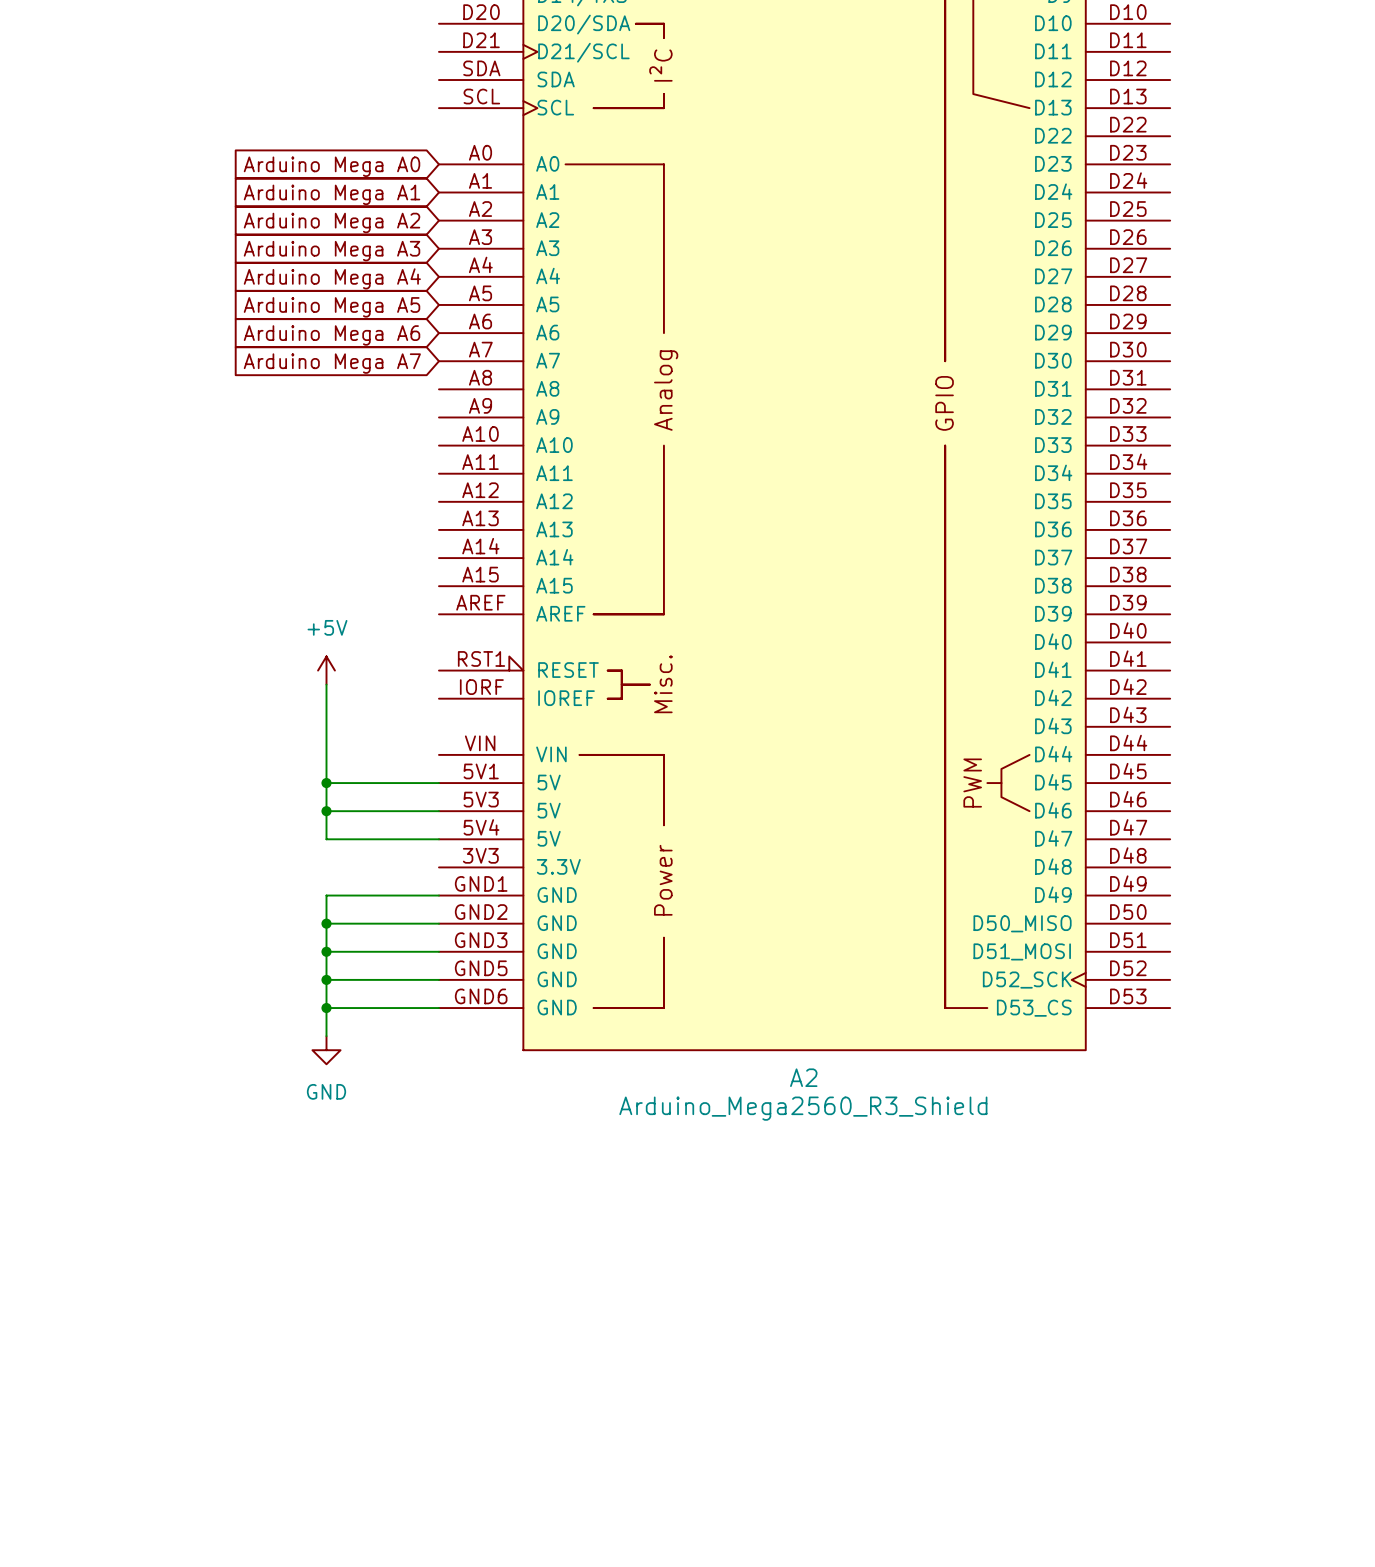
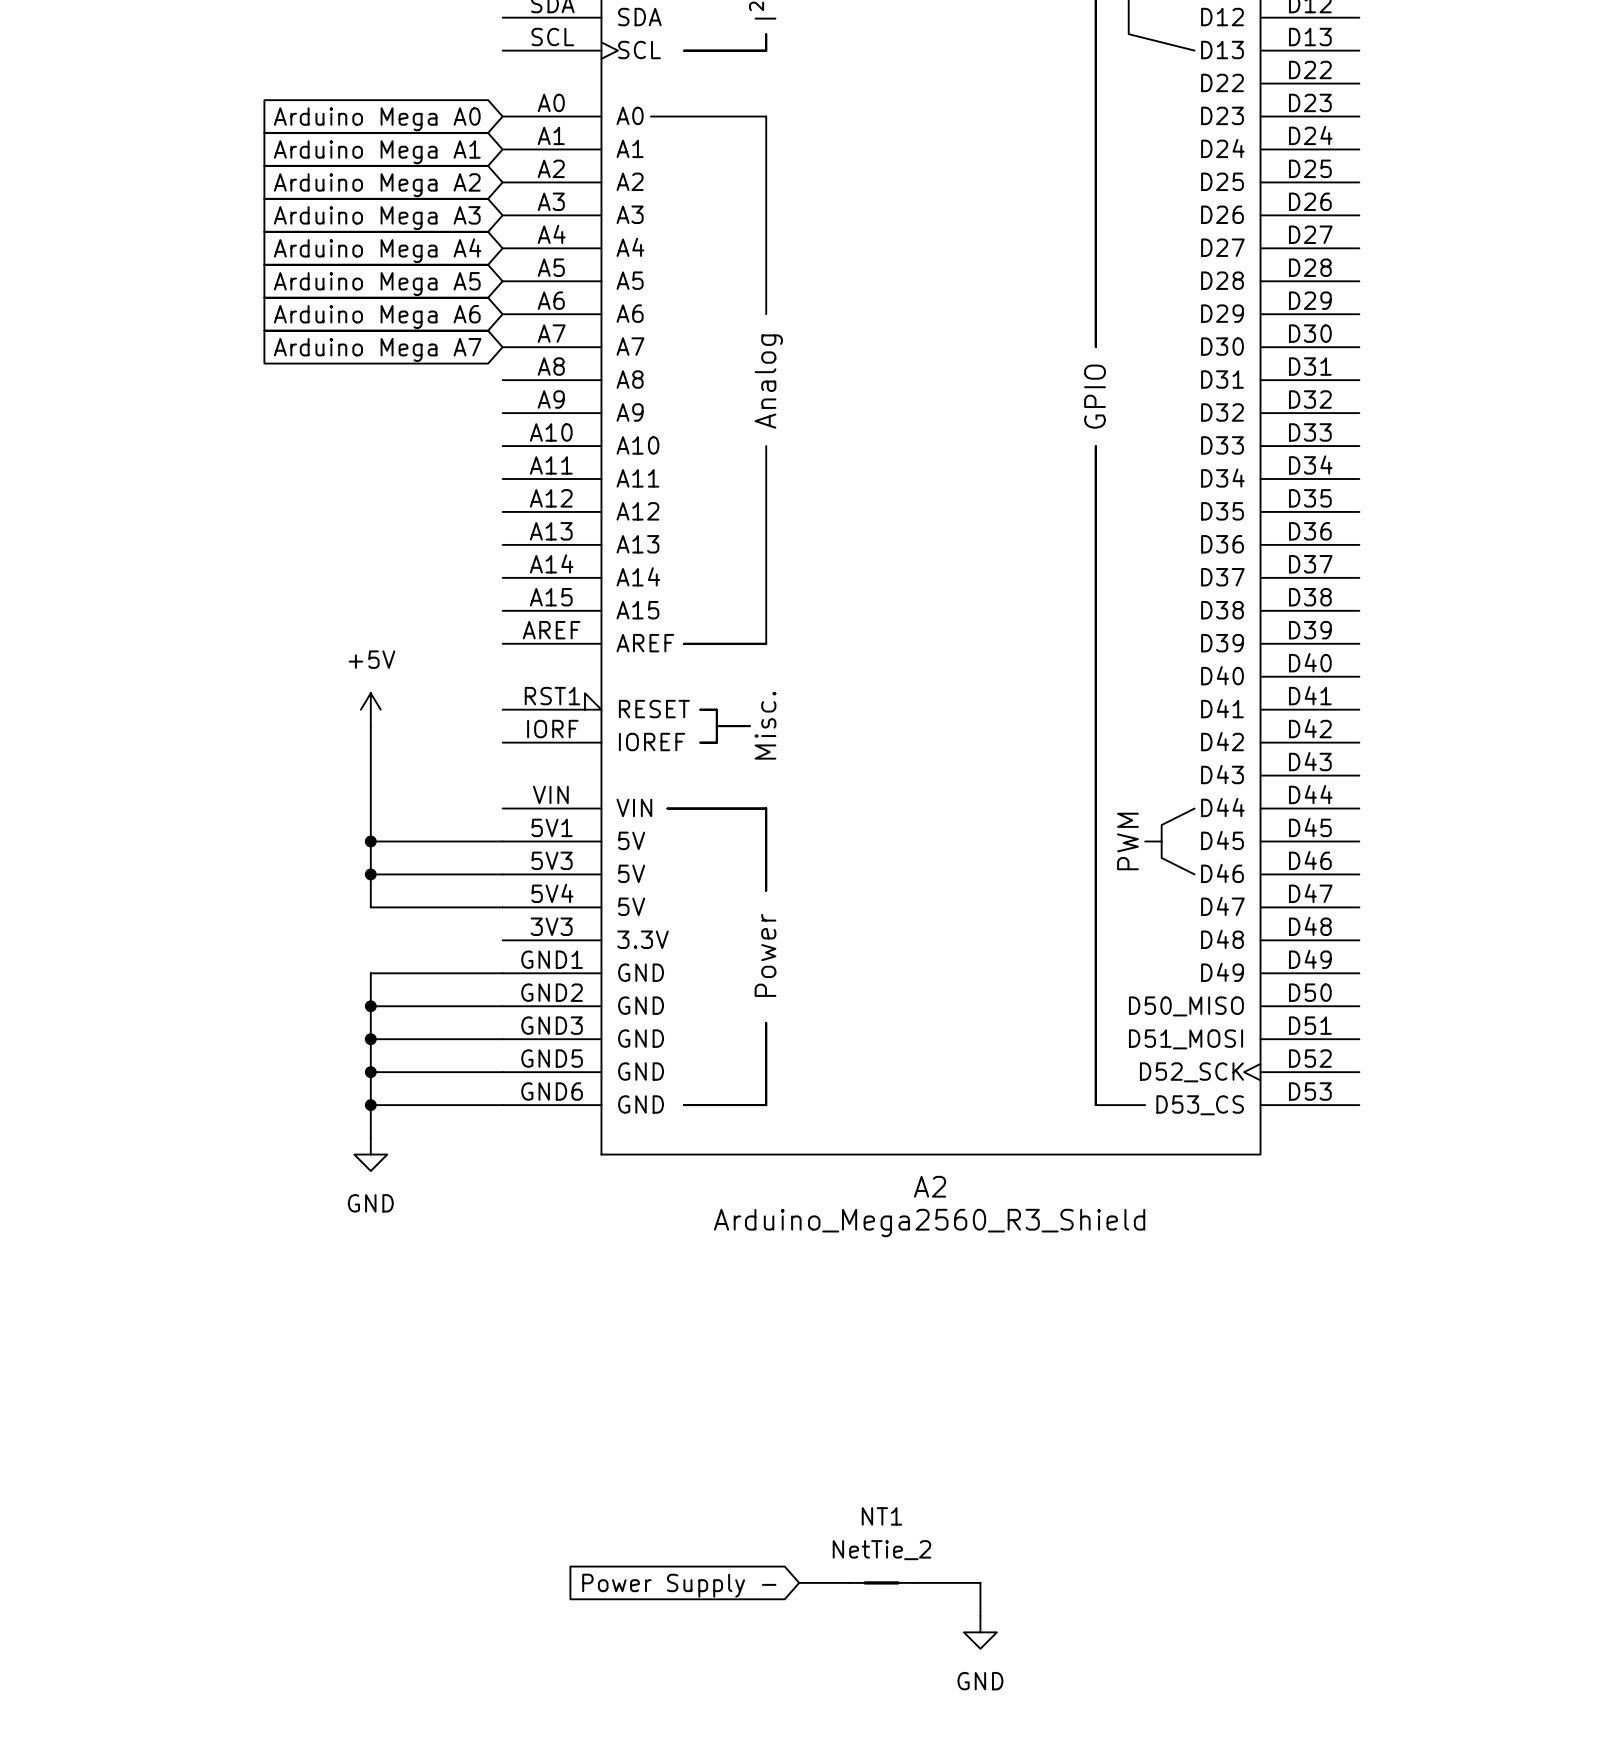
wire: none -> (799, 1582) (848, 1582)
NT1: none -> NetTie_2 (881, 1582)
wire: none -> (914, 1582) (980, 1582) (980, 1615)
global label: none -> Power Supply - (679, 1585)
power symbol: none -> GND (980, 1632)

